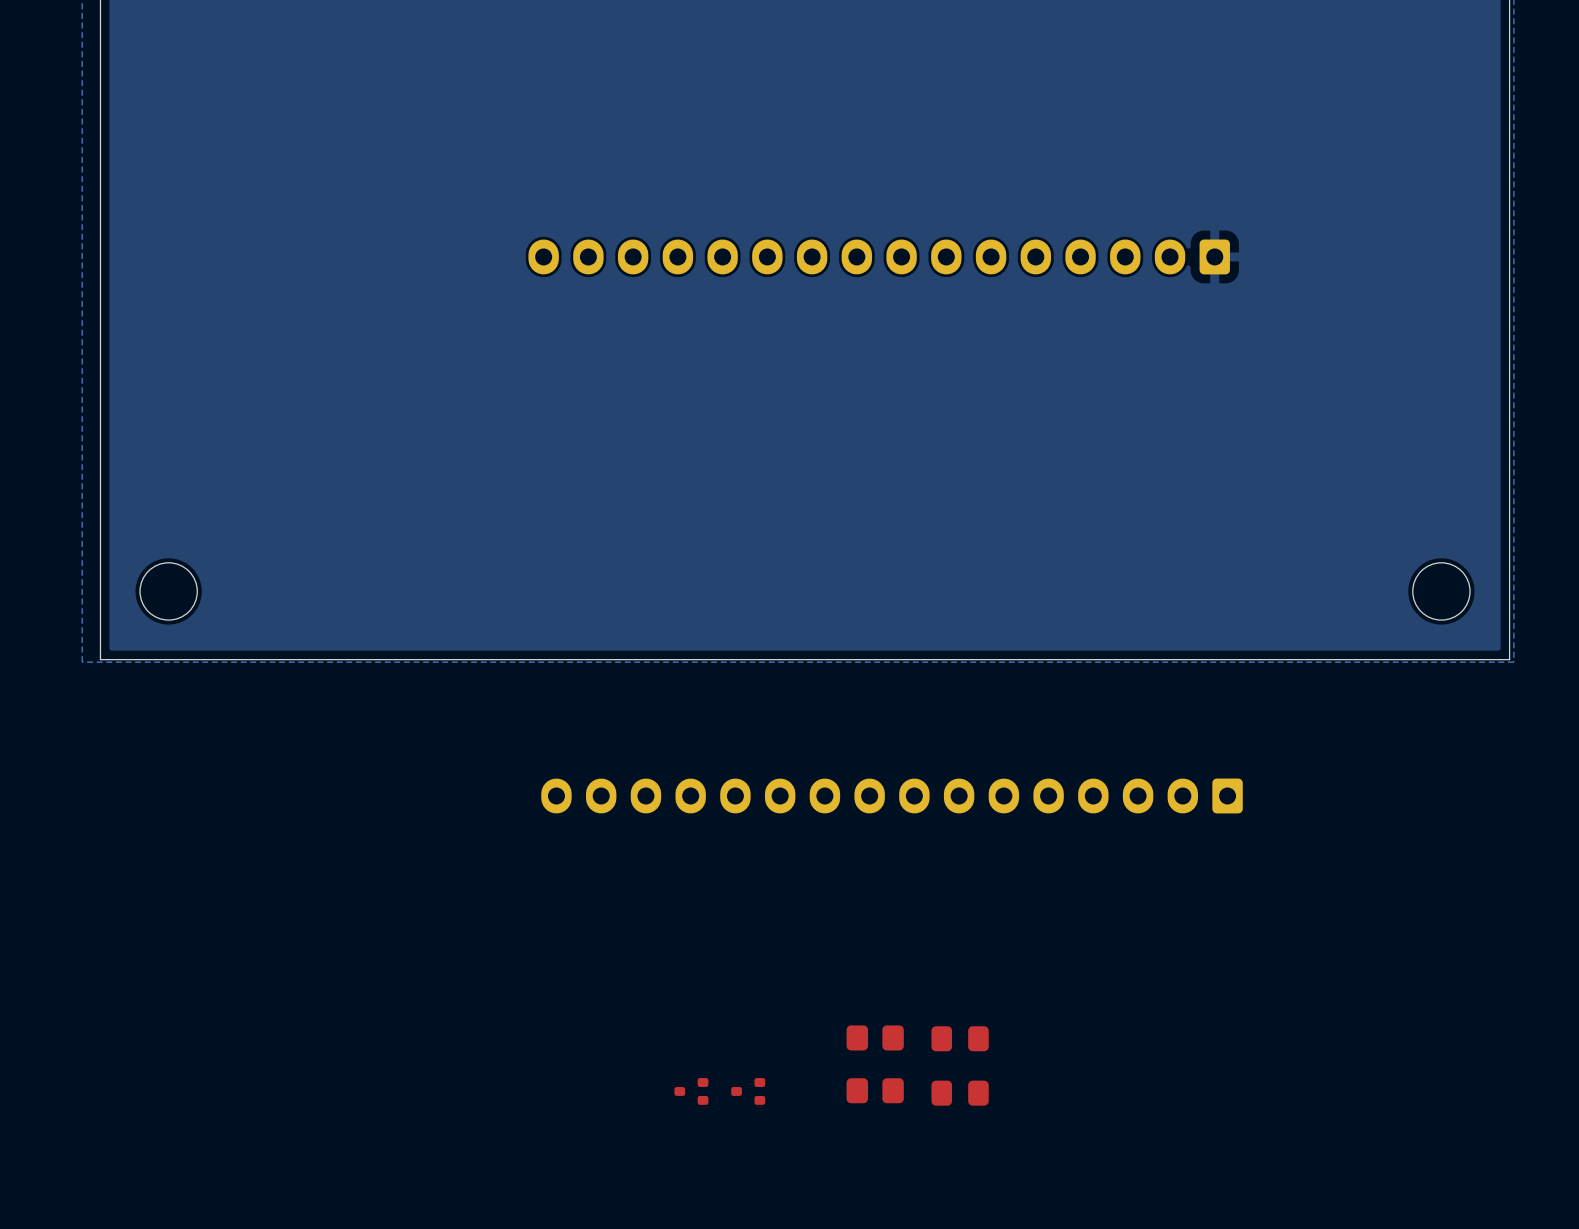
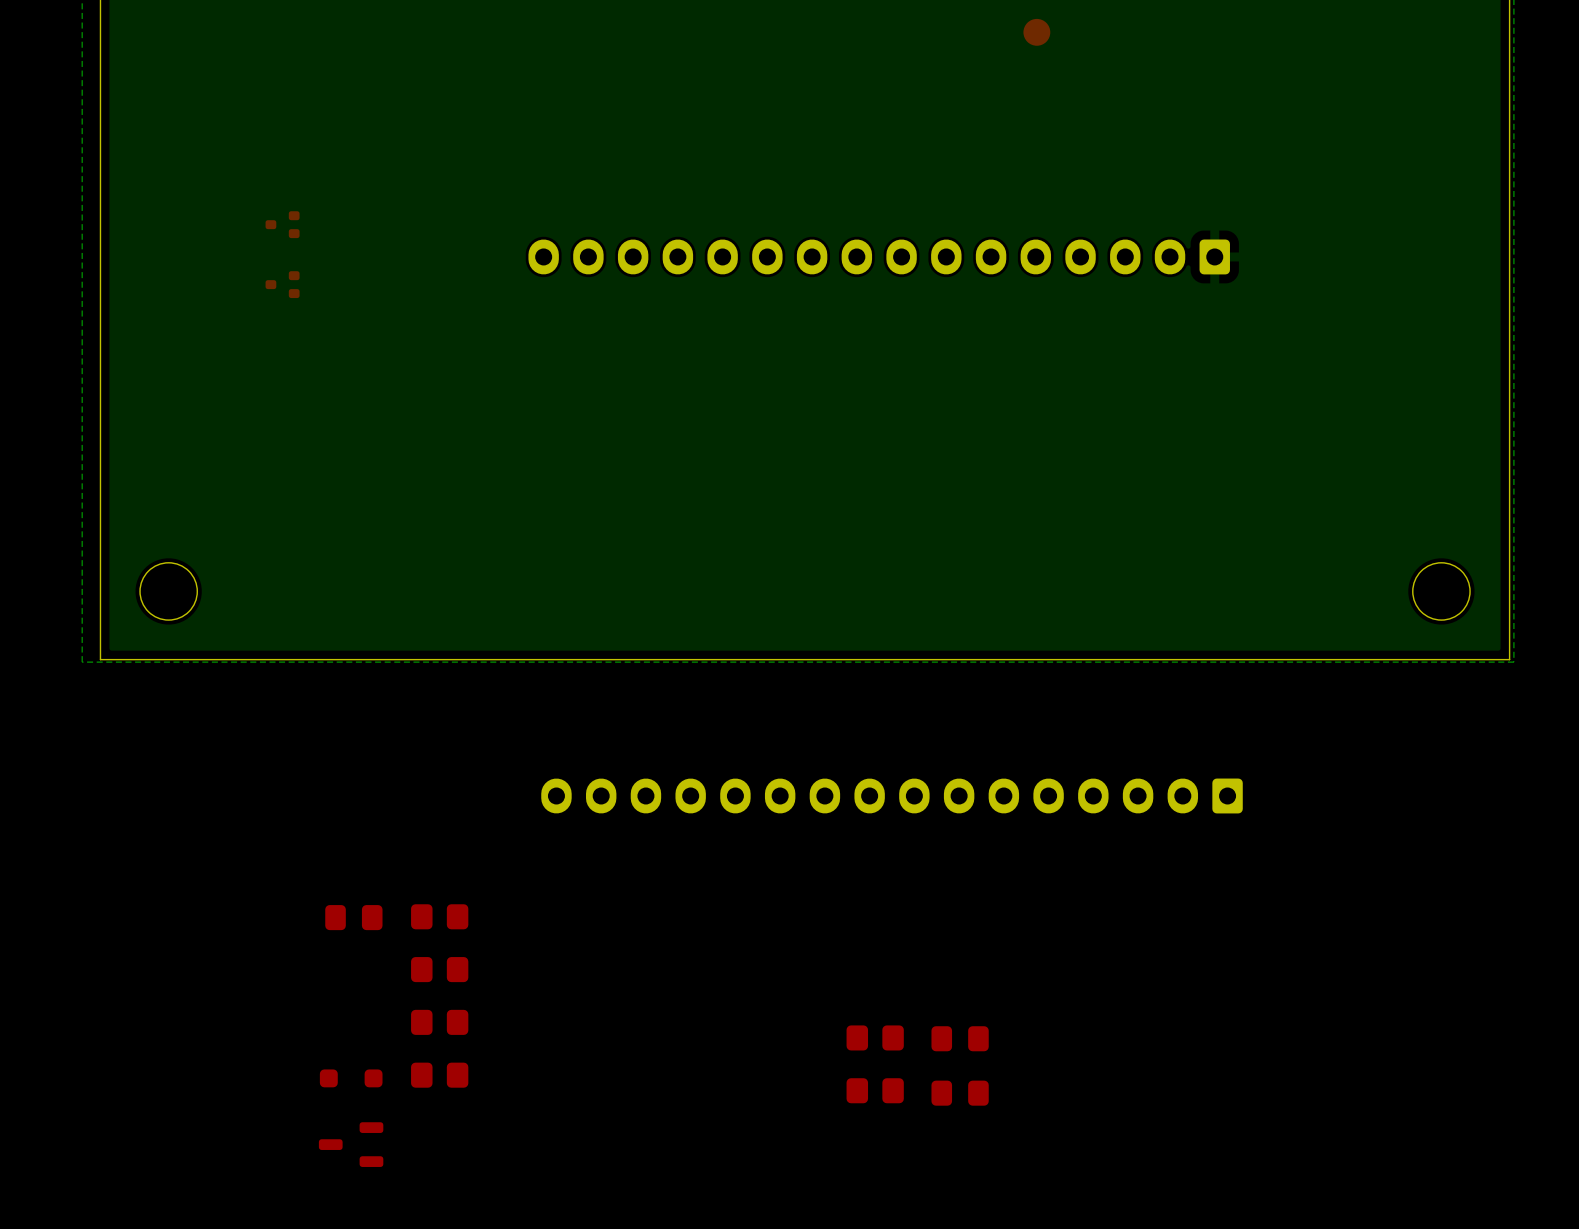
part: none -> (1036, 32)
part: none -> (282, 224)
part: none -> (282, 284)
part: none -> (439, 916)
part: none -> (353, 917)
part: none -> (439, 969)
part: none -> (439, 1022)
part: none -> (439, 1075)
part: none -> (351, 1078)
part: (691, 1091) -> none
part: (748, 1091) -> none
part: none -> (351, 1144)

